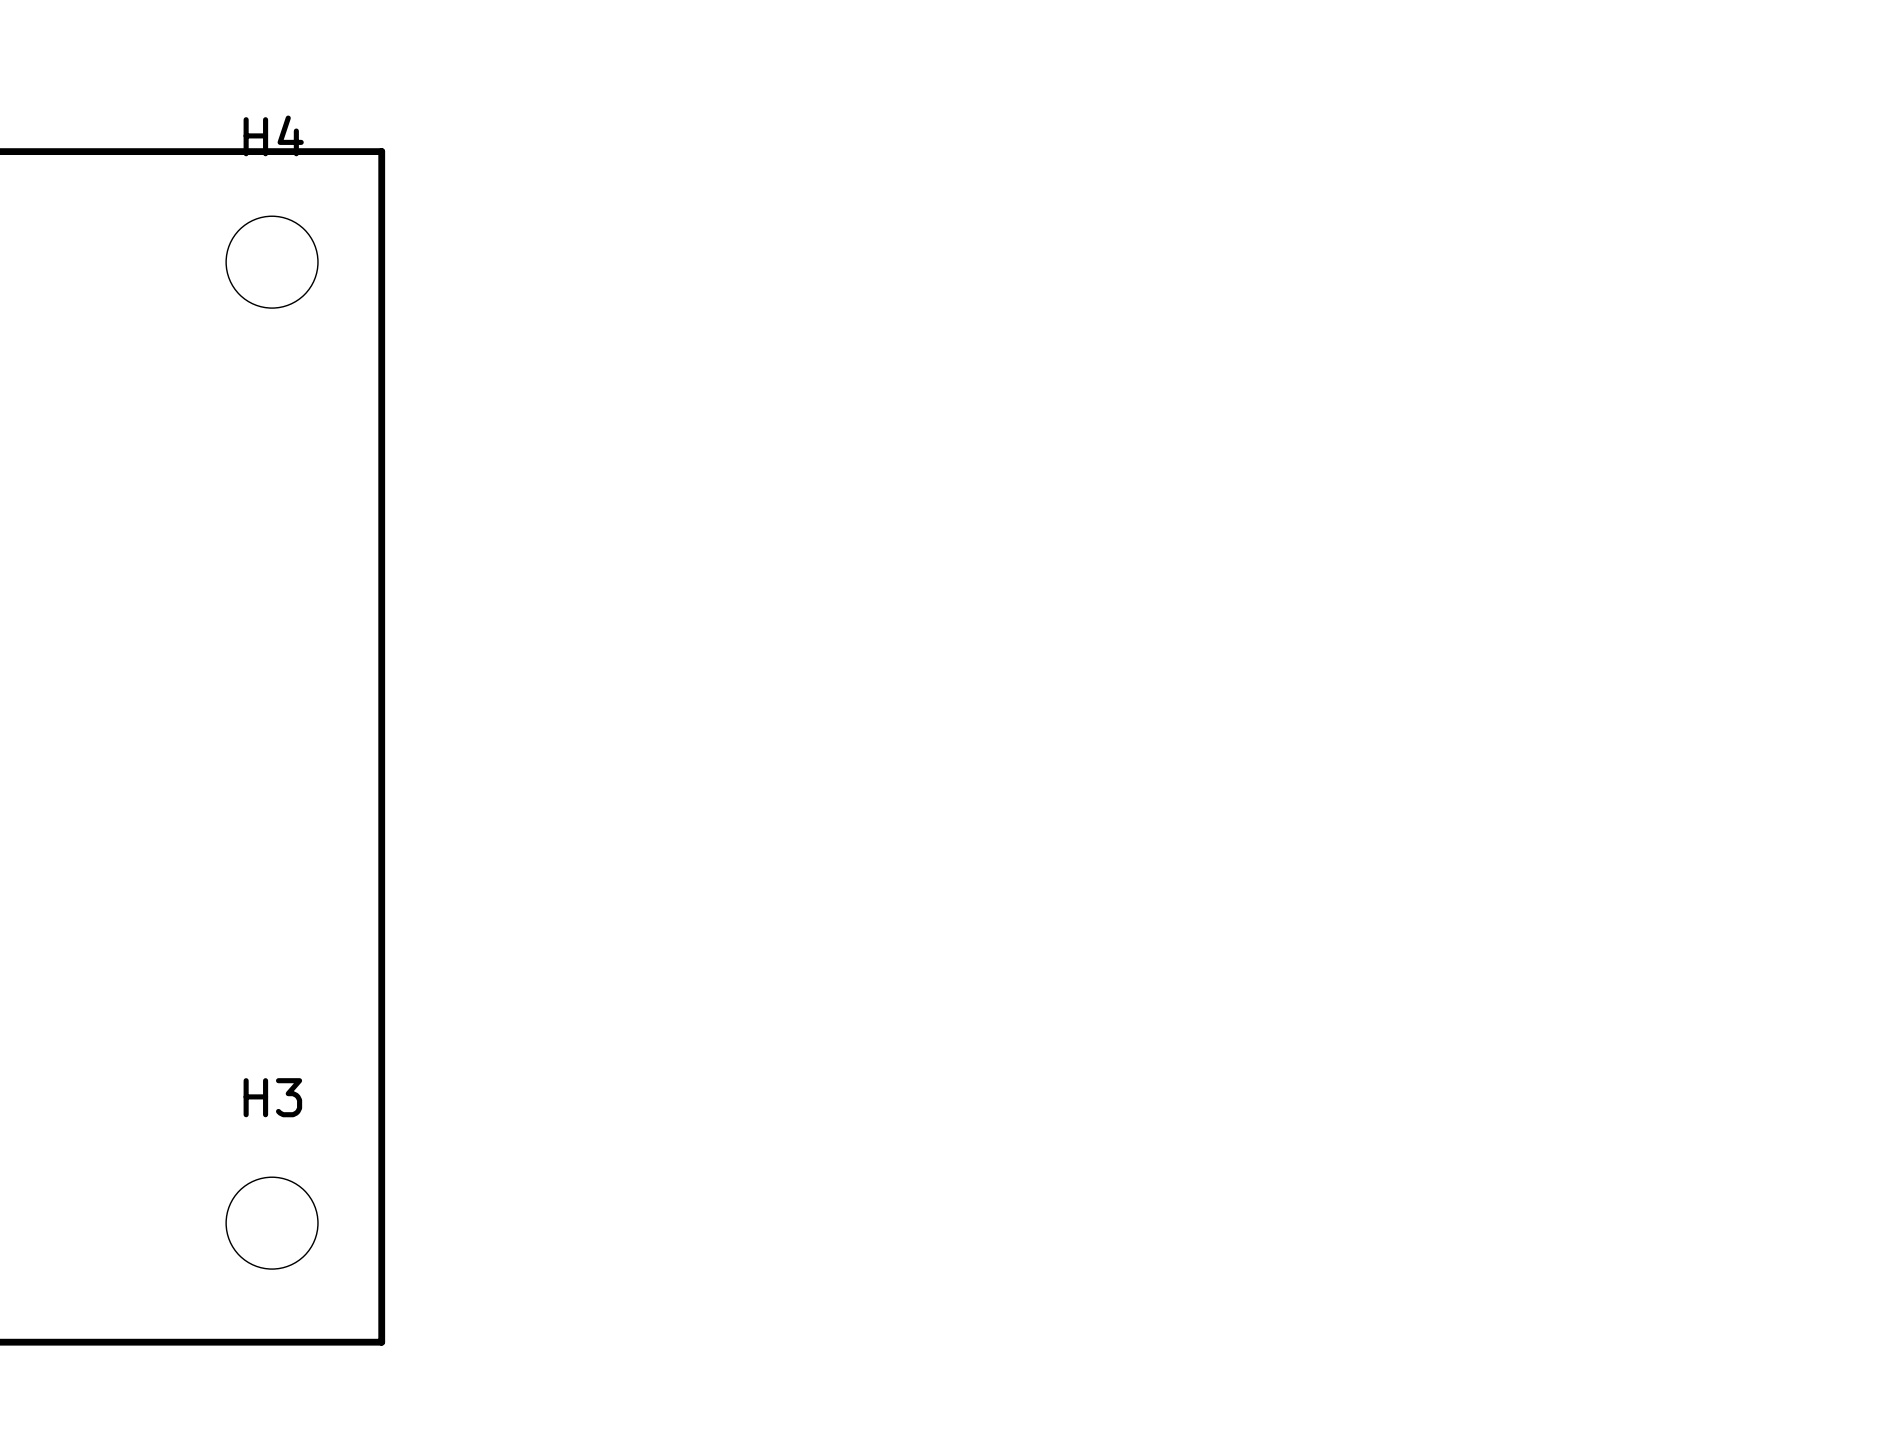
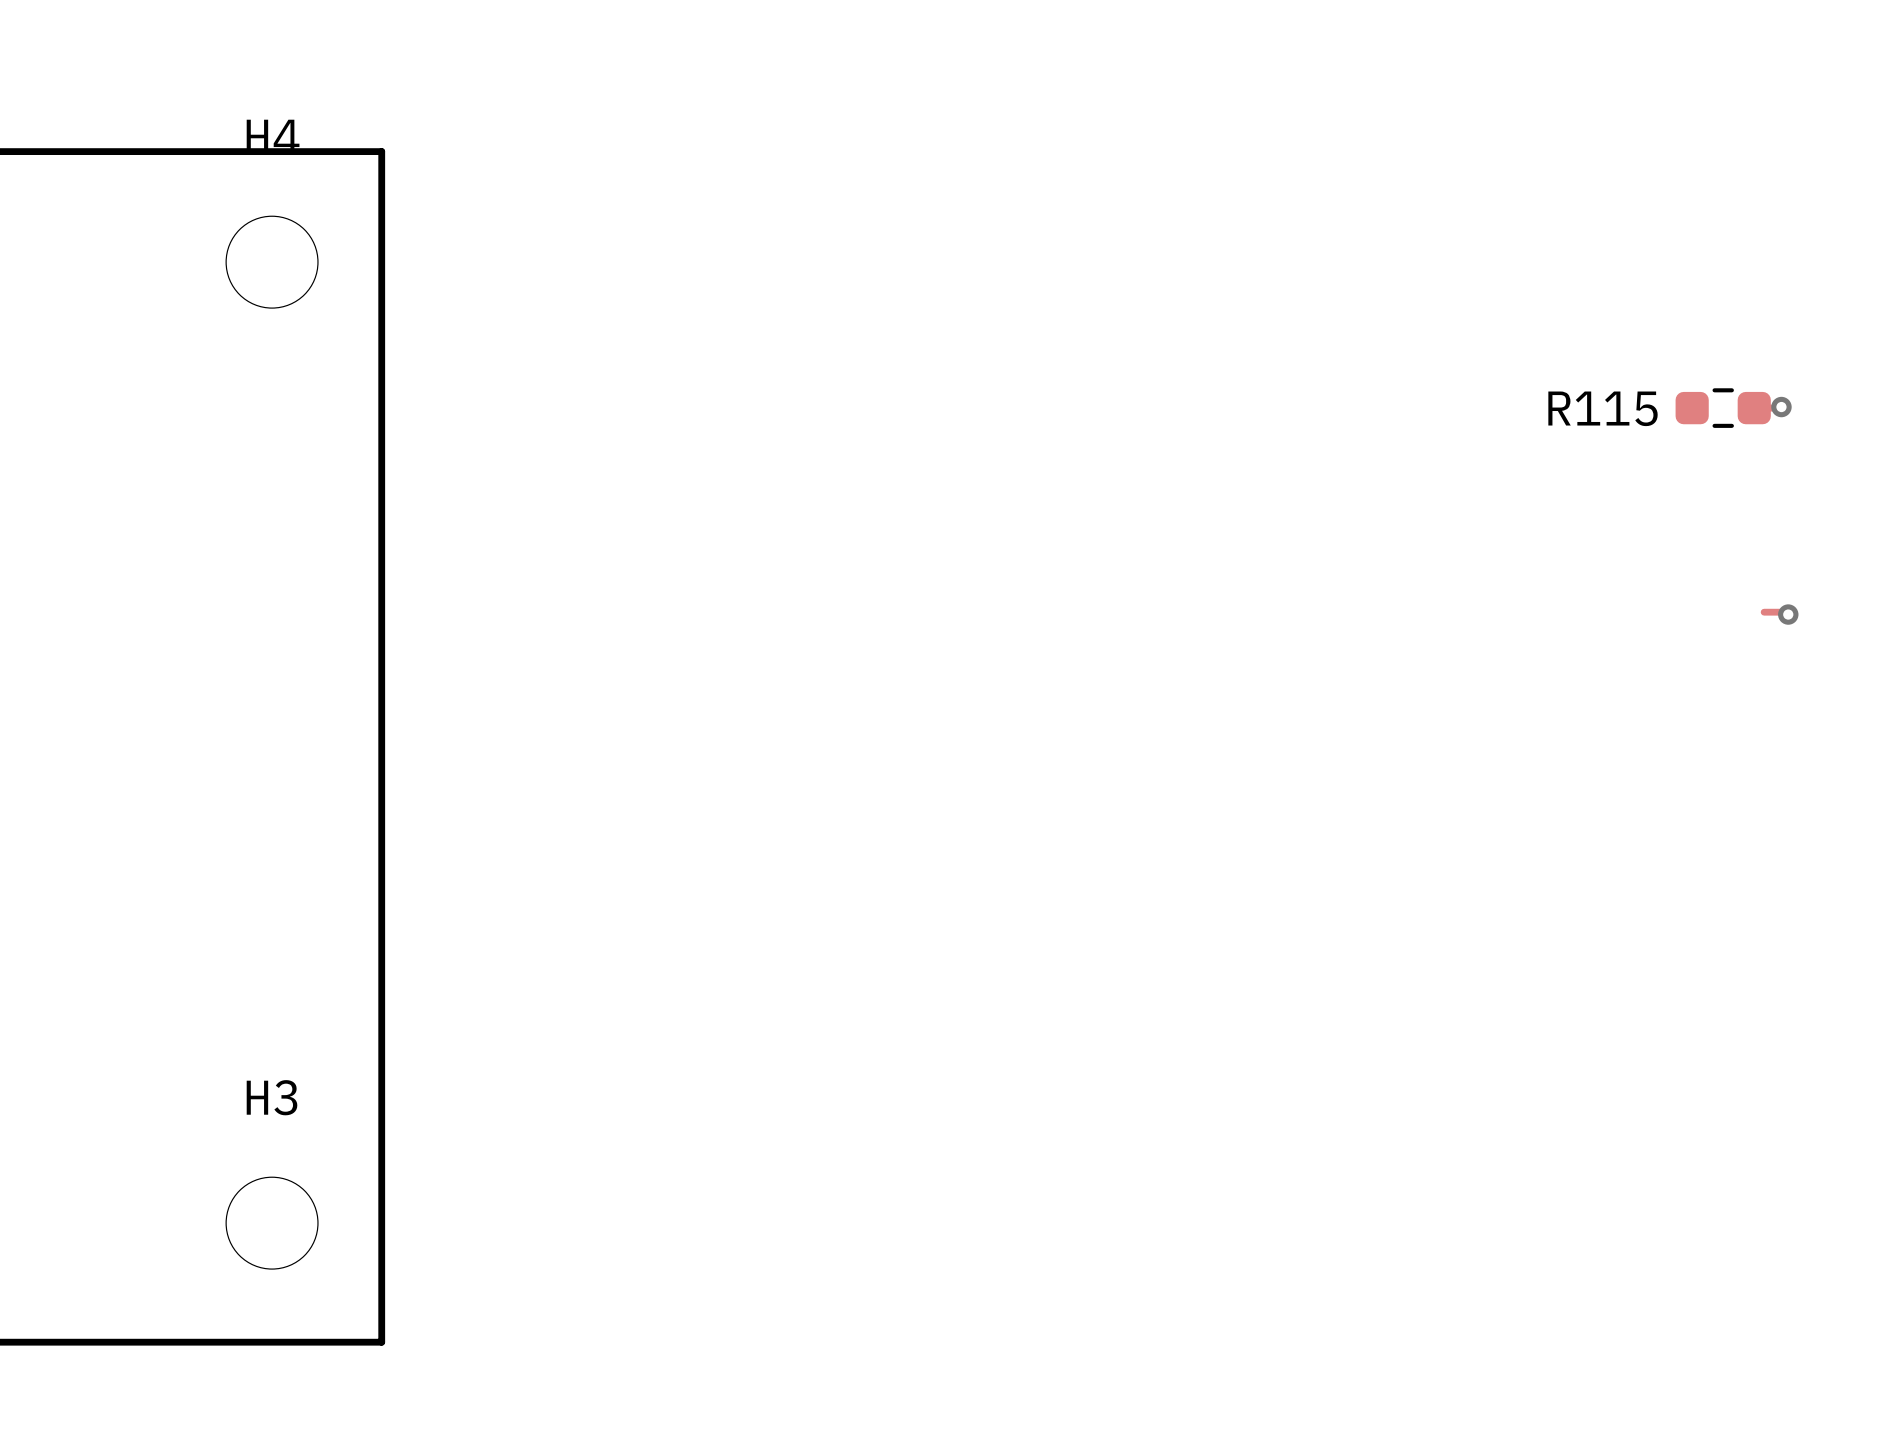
via: none -> (1781, 407)
R115: none -> (1723, 408)
track: none -> (1764, 612) (1785, 612) (1788, 614)
via: none -> (1788, 614)

